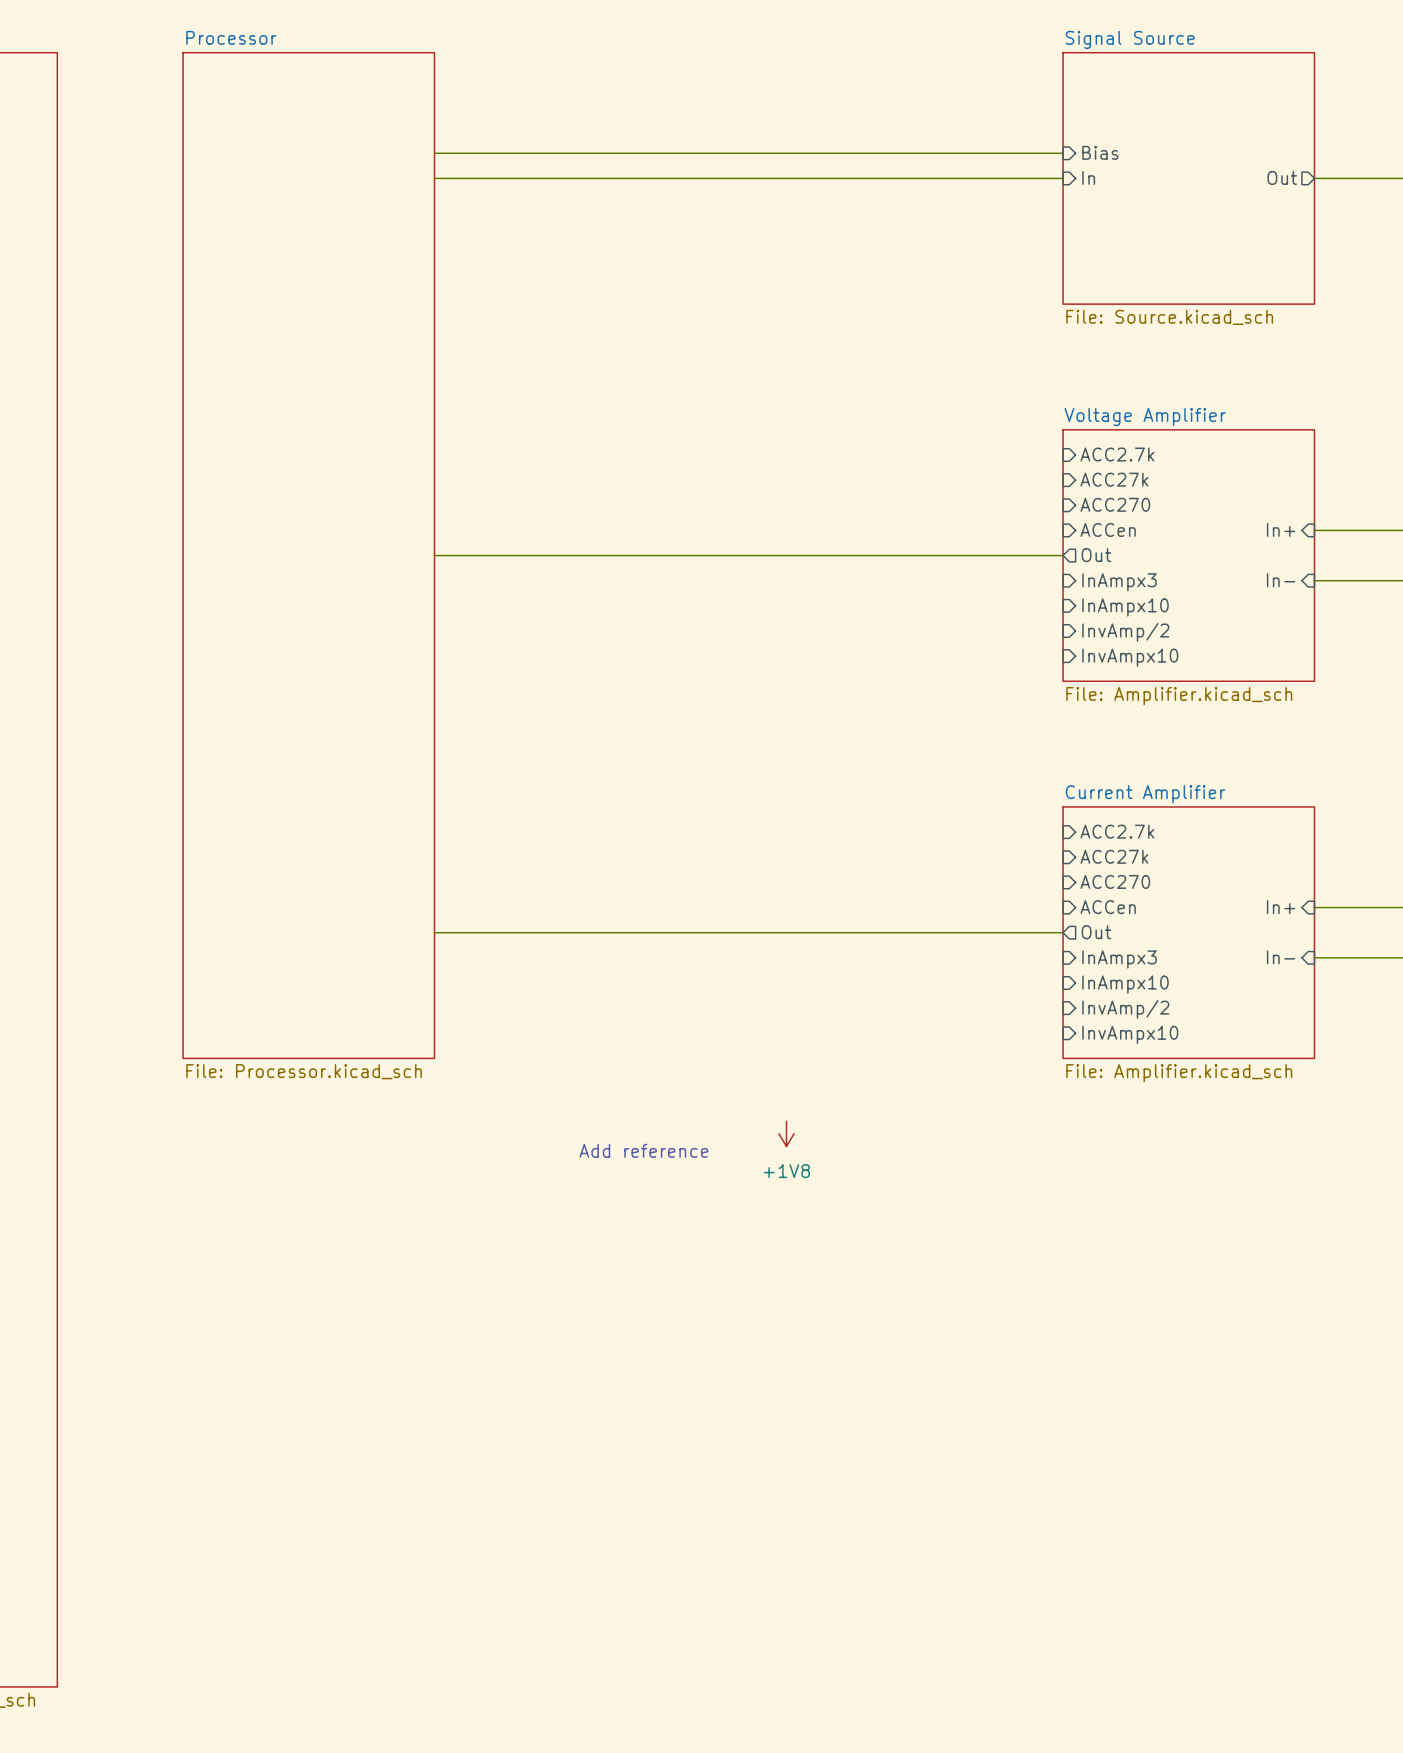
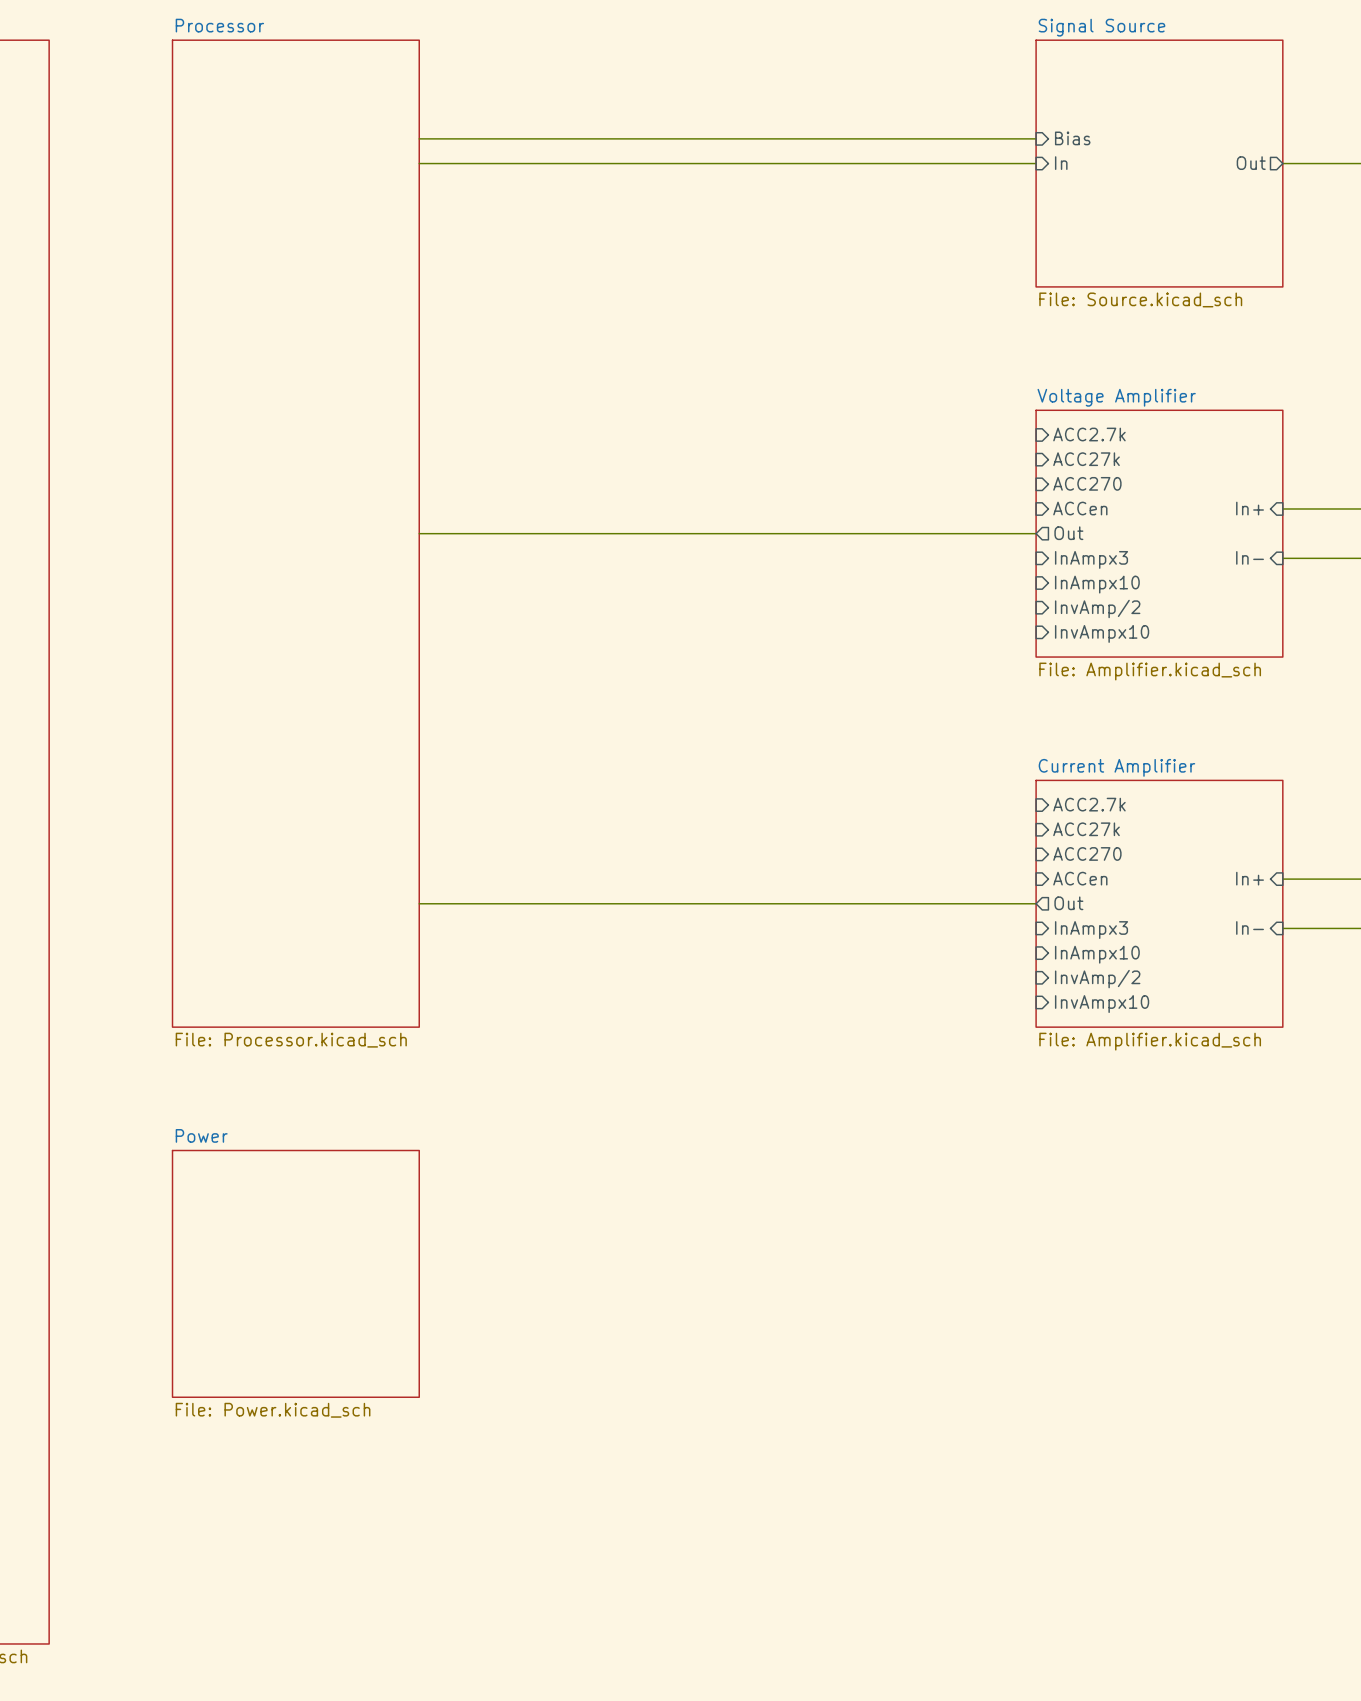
power symbol: +1V8 (786, 1133) -> none
text: Add reference (643, 1150) -> none
sheet Power: none -> File: Power.kicad_sch (295, 1273)

